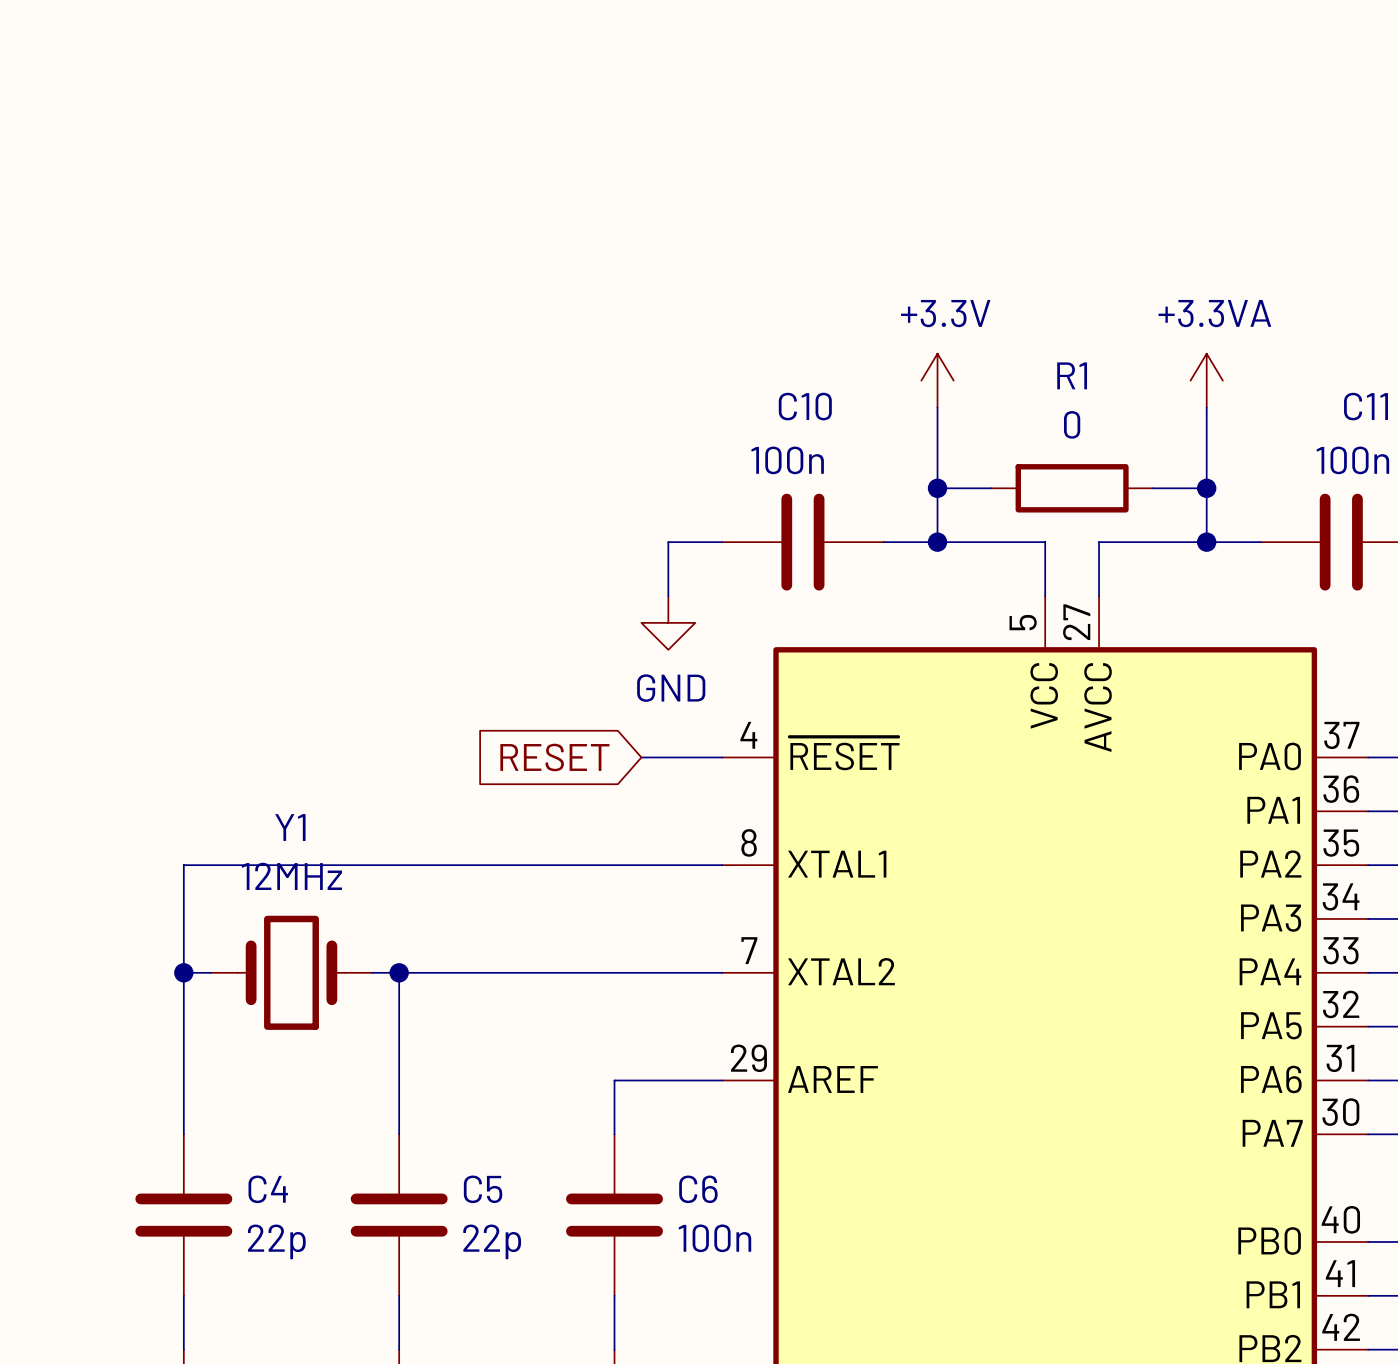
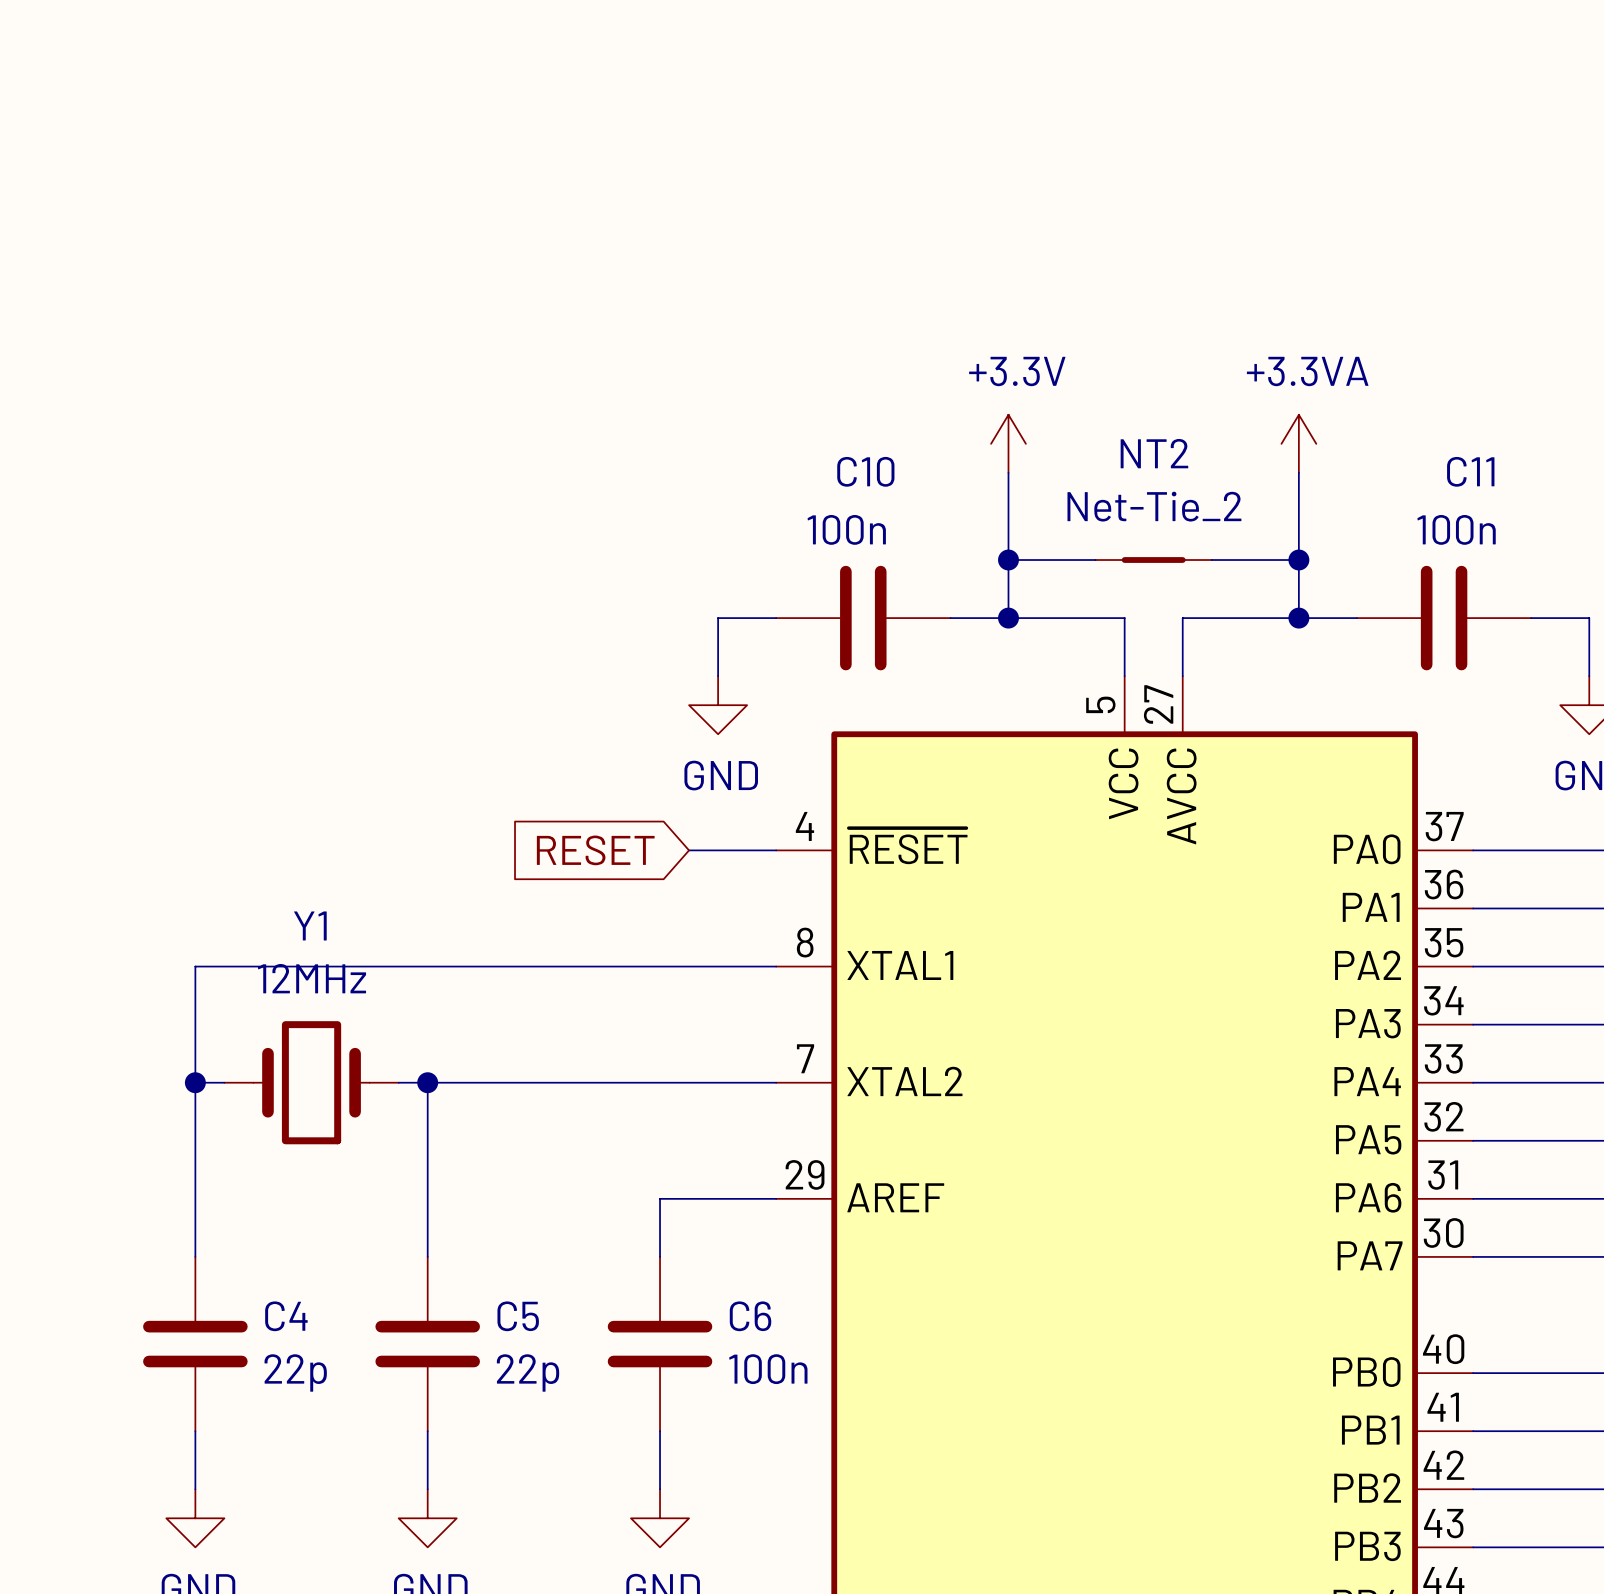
R1: 0 (1072, 488) -> none
NT2: none -> Net-Tie_2 (1153, 560)

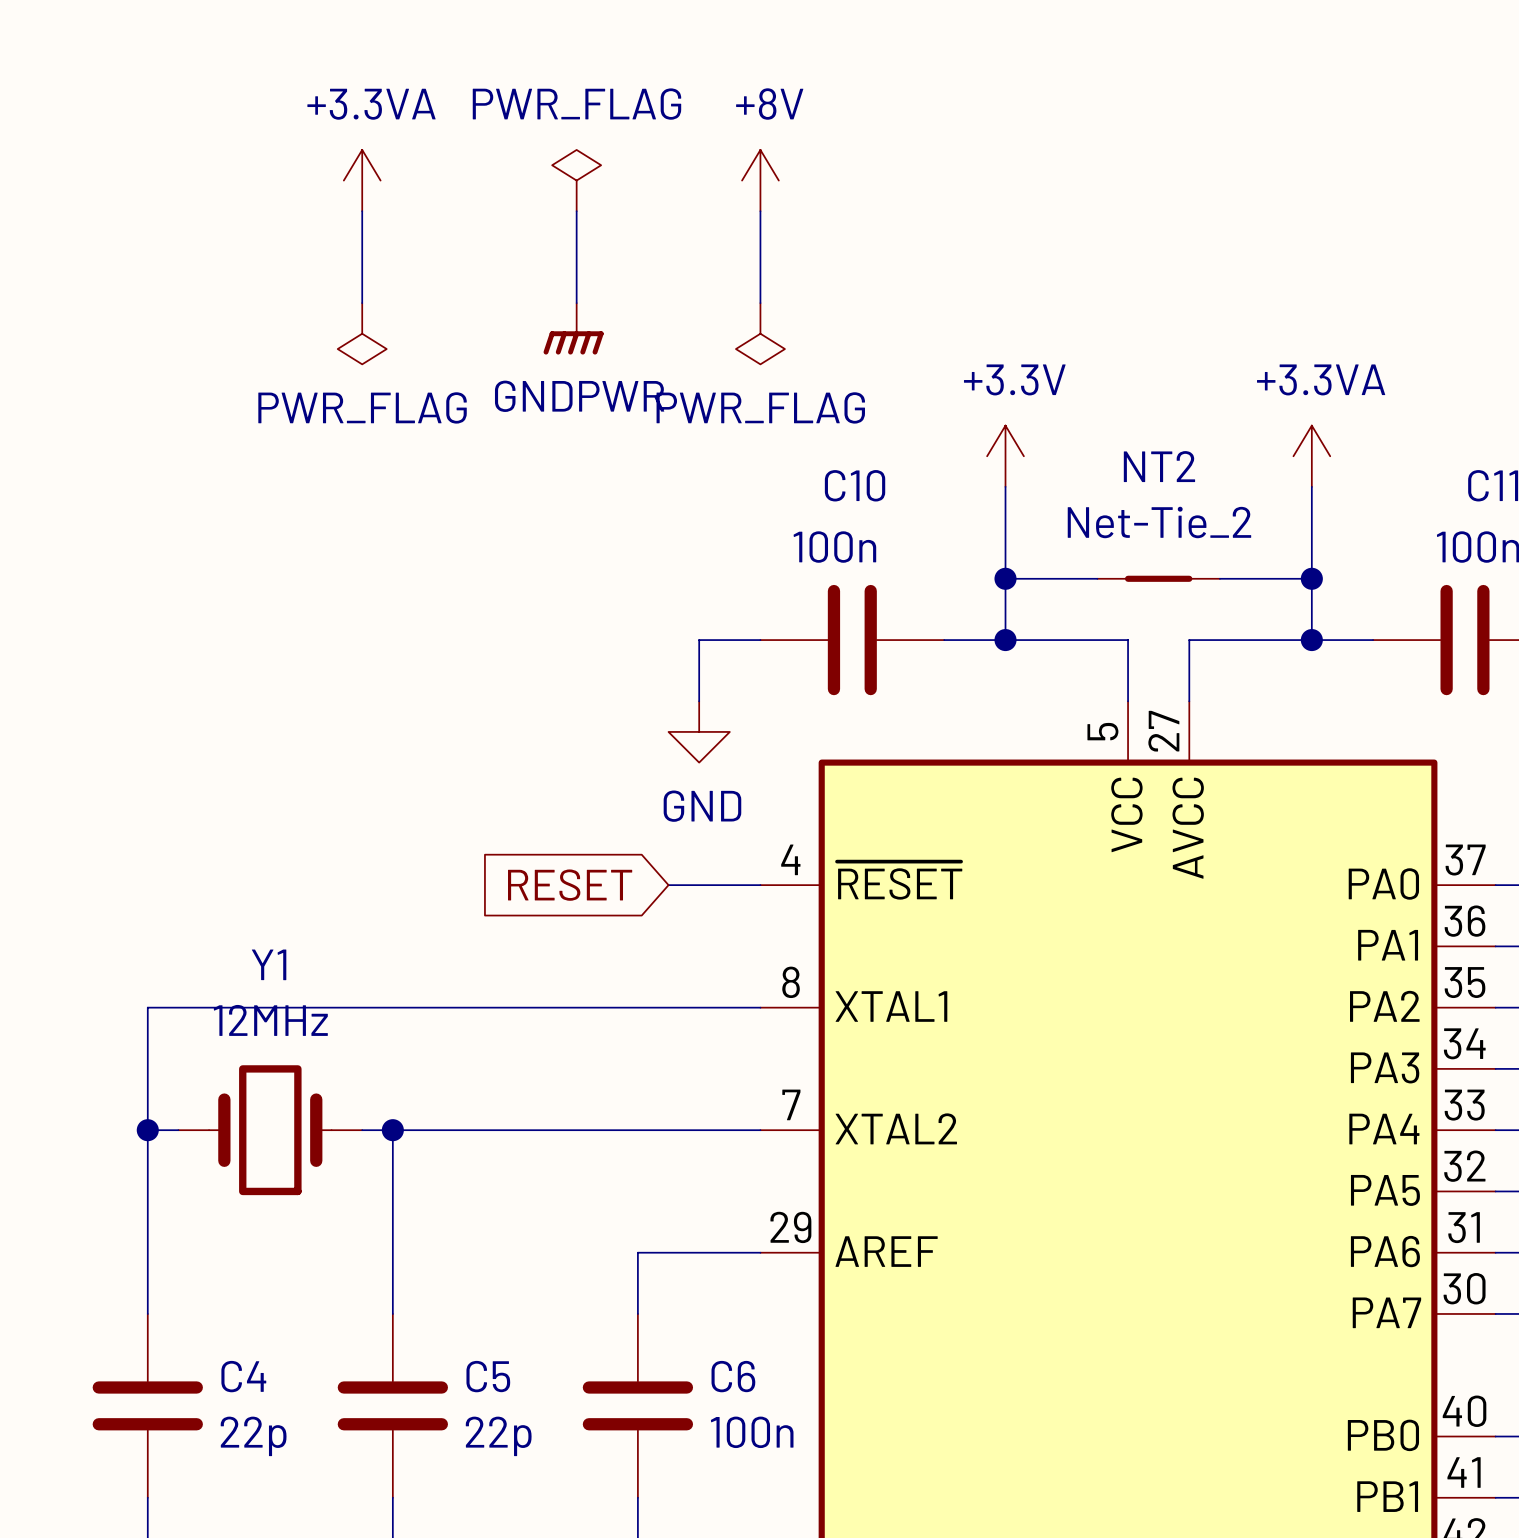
power symbol: none -> +3.3VA (362, 180)
power symbol: none -> PWR_FLAG (576, 180)
power symbol: none -> +8V (760, 180)
wire: none -> (362, 211) (362, 303)
wire: none -> (576, 211) (576, 303)
wire: none -> (760, 211) (760, 303)
power symbol: none -> GNDPWR (573, 328)
power symbol: none -> PWR_FLAG (362, 333)
power symbol: none -> PWR_FLAG (760, 333)

